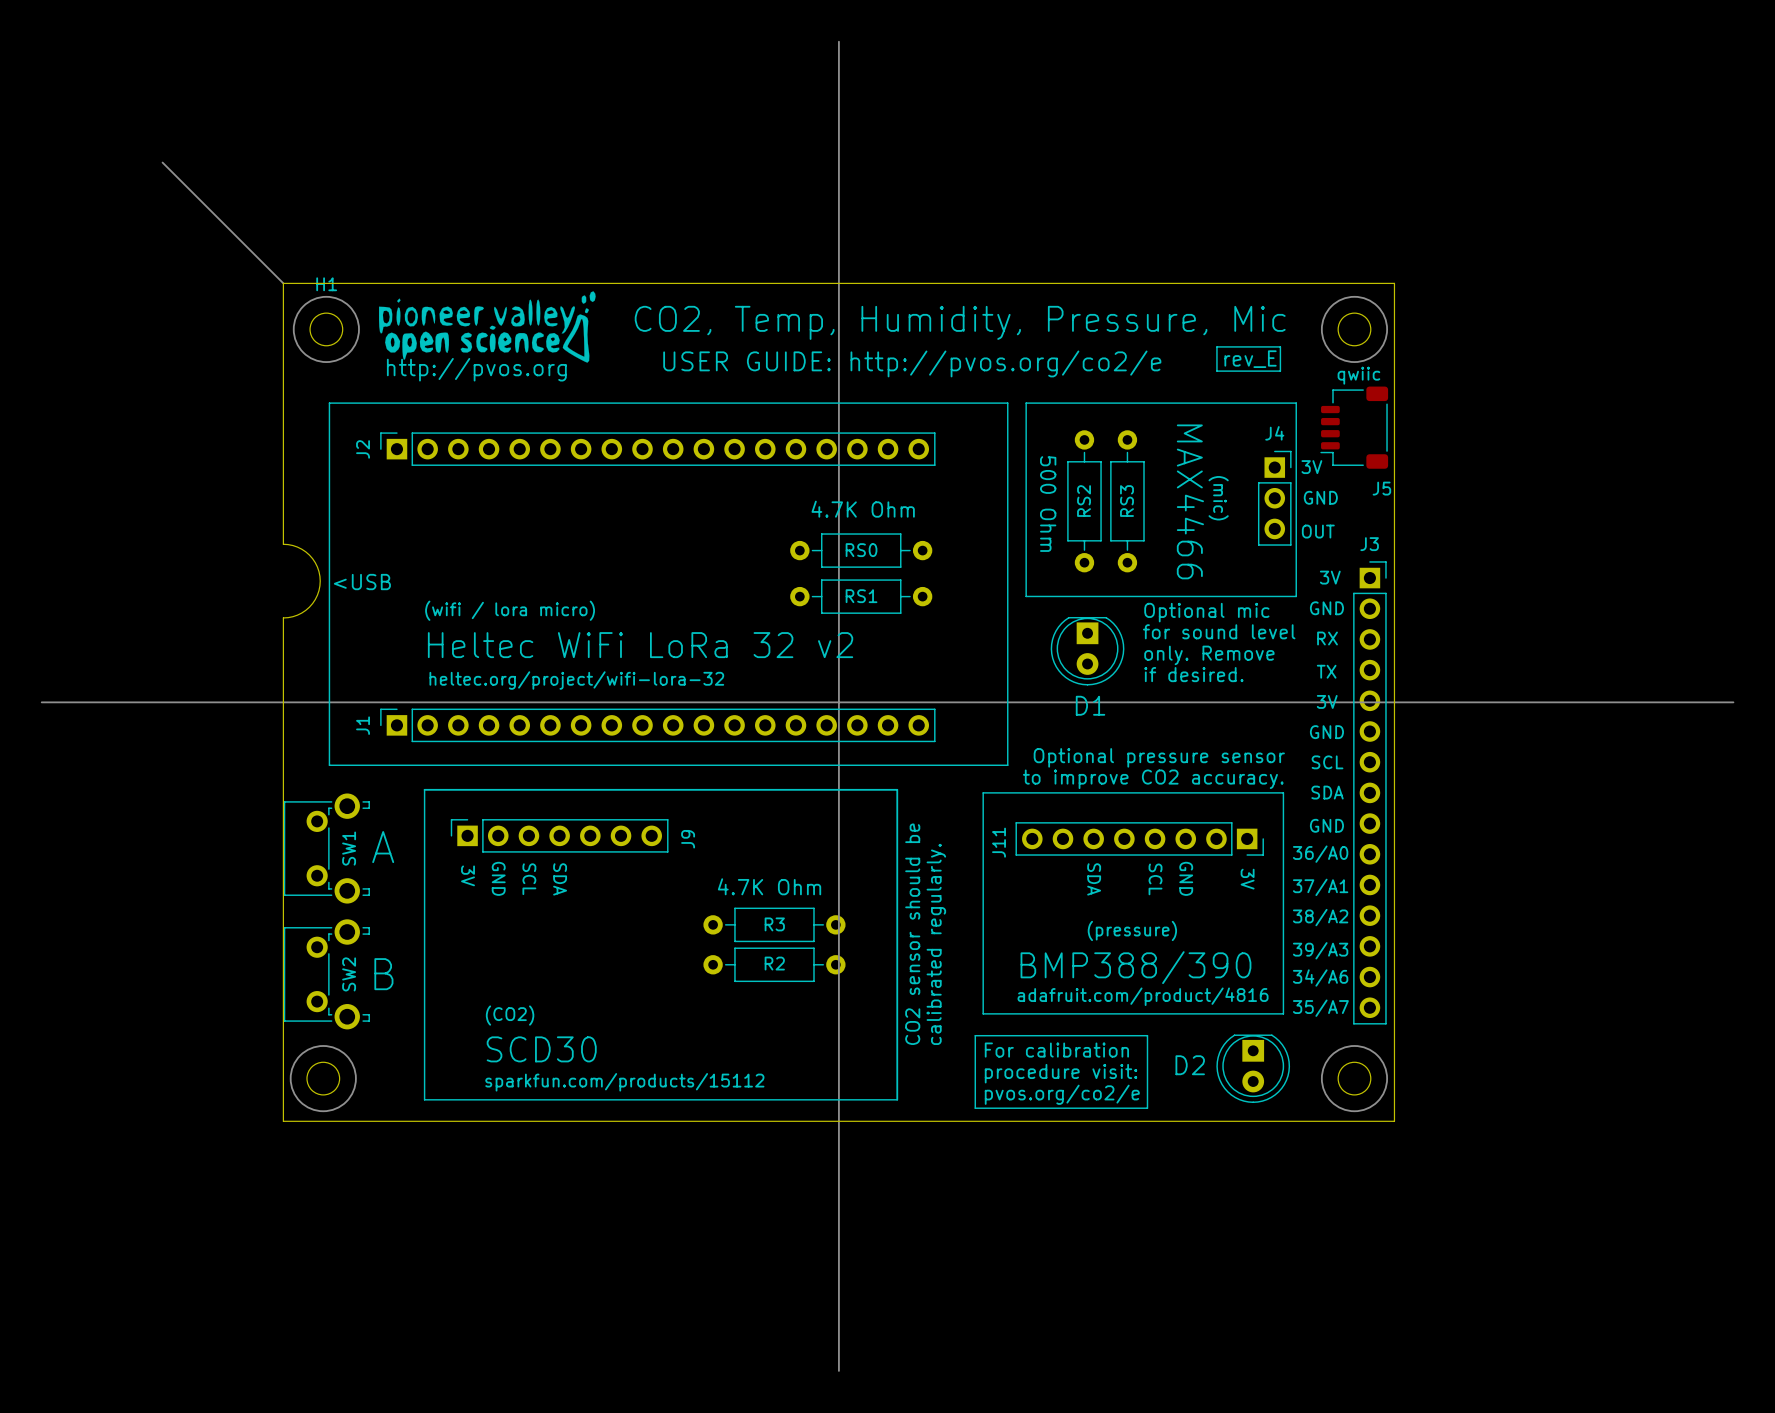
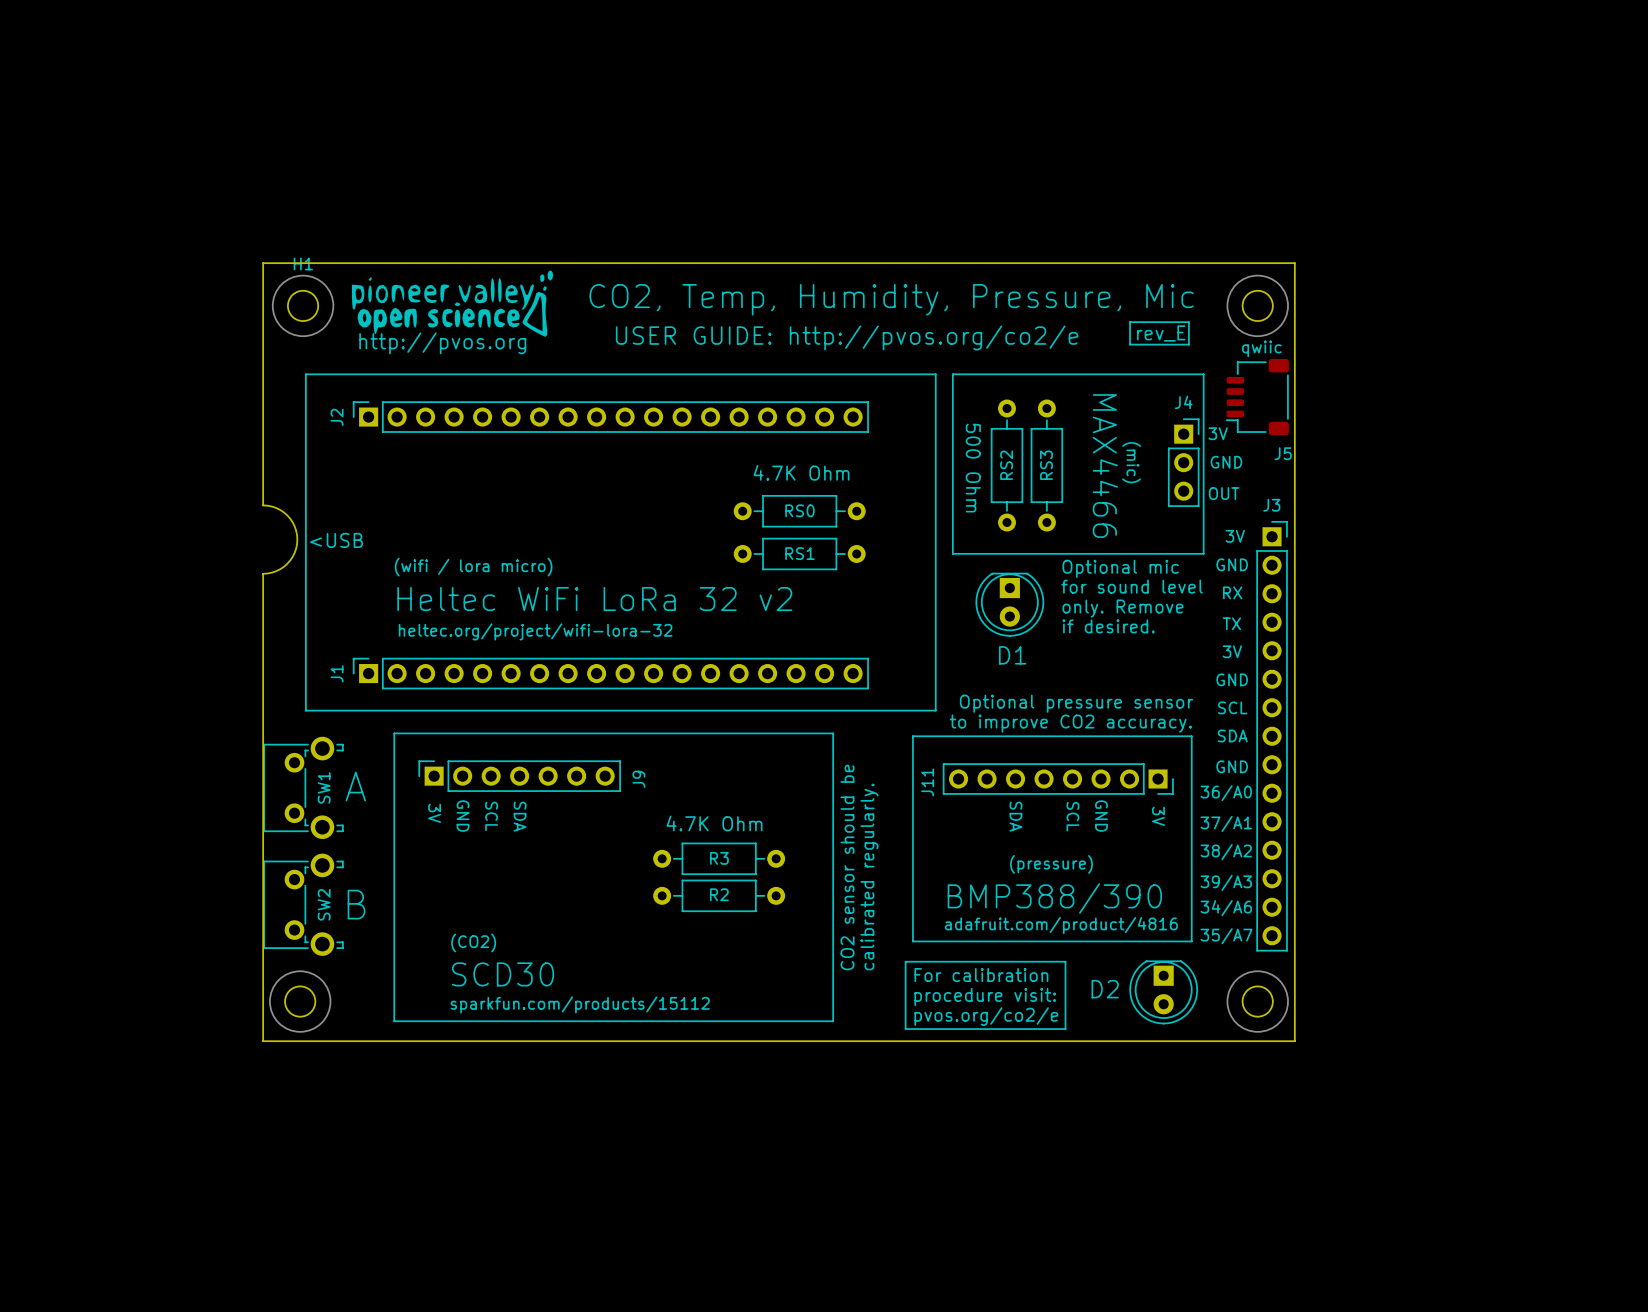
line: (838, 41) (838, 1370) -> none
line: (162, 162) (283, 283) -> none
line: (41, 702) (1733, 702) -> none

